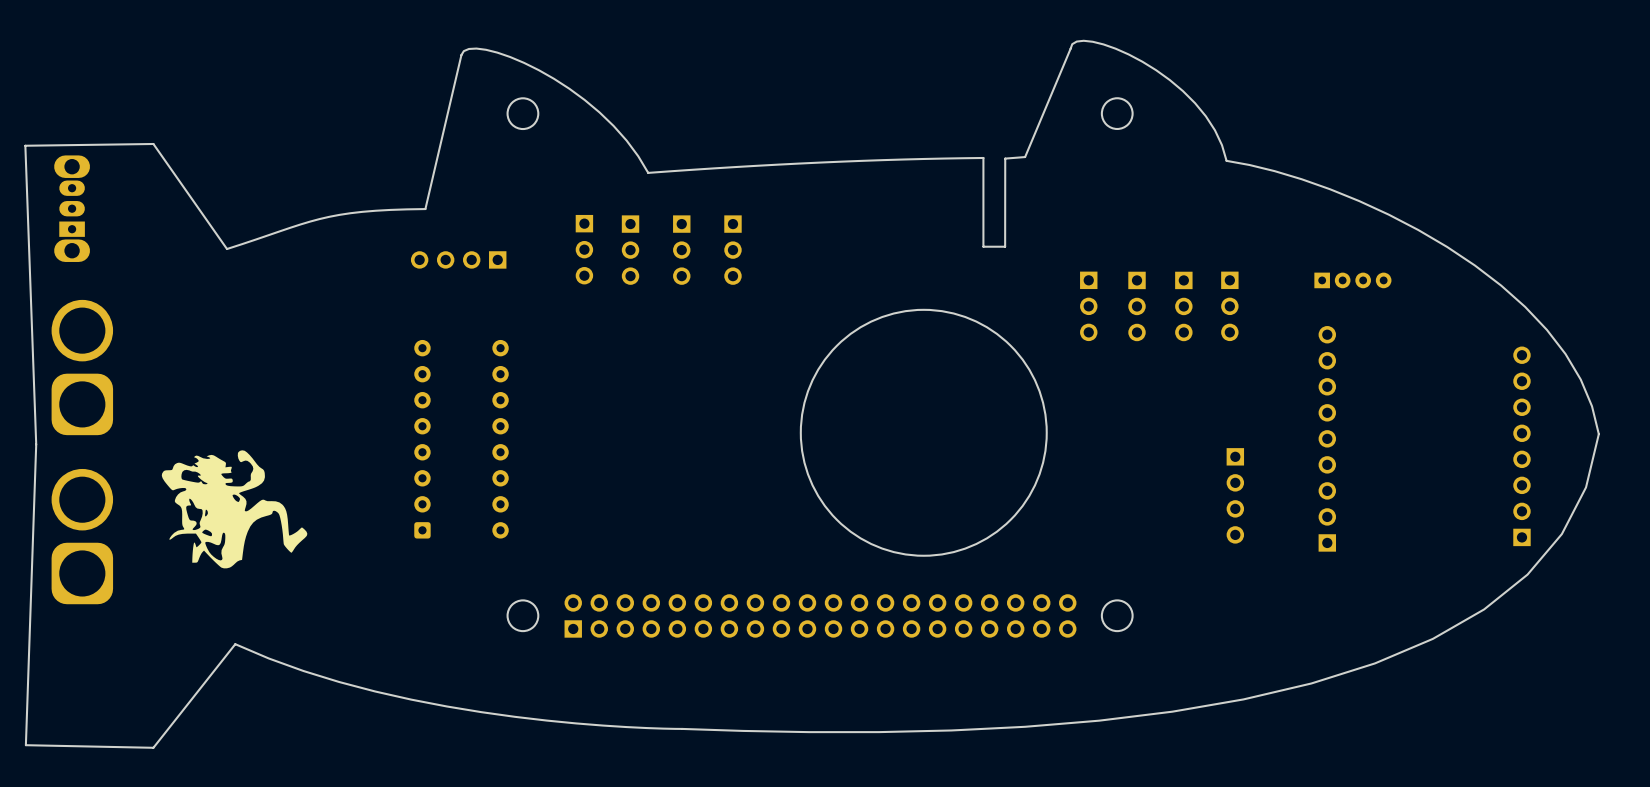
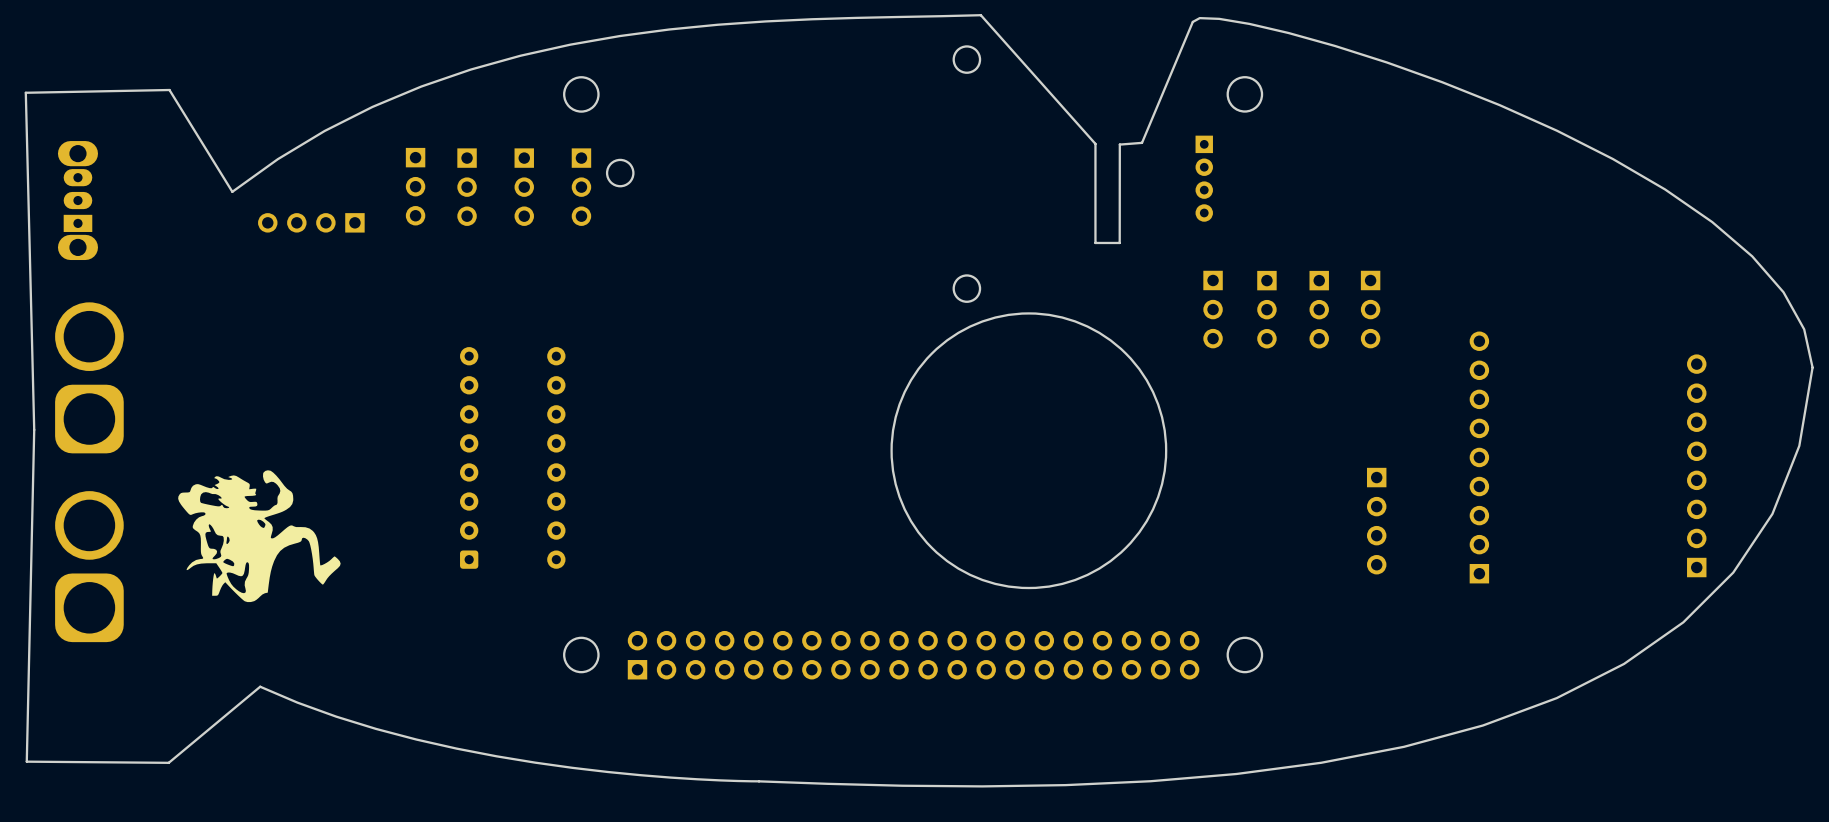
board edge: (1070, 48) (1072, 44) (1076, 41) (1092, 41) (1115, 48) (1142, 61) (1169, 80) (1195, 103) (1214, 130) (1226, 160) (1301, 179) (1388, 214) (1447, 246) (1474, 265) (1525, 306) (1546, 329) (1565, 354) (1580, 379) (1592, 406) (1598, 434) (1586, 487) (1561, 534) (1527, 574) (1484, 609) (1432, 638) (1374, 663) (1311, 683) (1243, 699) (1172, 711) (1025, 726) (879, 732) (682, 728) -> (1192, 21) (1199, 18) (1219, 18) (1288, 33) (1386, 62) (1442, 82) (1557, 130) (1612, 158) (1665, 189) (1712, 222) (1752, 256) (1783, 292) (1804, 329) (1812, 367) (1799, 445) (1772, 513) (1733, 572) (1683, 622) (1624, 663) (1556, 698) (1482, 725) (1404, 746) (1321, 762) (1236, 773) (1150, 781) (982, 786) (759, 781)
round board edge: none -> [952, 45, 982, 74]
board edge: (983, 157) (821, 162) (648, 172) (638, 156) (613, 125) (569, 88) (524, 62) (497, 52) (476, 48) (463, 51) (461, 55) (425, 209) (375, 210) (329, 216) (227, 249) (153, 143) (25, 145) (36, 444) (25, 745) (153, 747) (235, 644) -> (1095, 143) (980, 15) (811, 19) (717, 24) (619, 36) (520, 55) (470, 69) (421, 86) (372, 106) (324, 131) (277, 159) (232, 191) (169, 90) (25, 92) (34, 429) (26, 761) (168, 762) (260, 686)
round board edge: none -> [605, 158, 635, 188]
part: none -> (1204, 178)
part: none -> (415, 186)
part: none -> (467, 187)
part: none -> (524, 187)
part: none -> (581, 187)
part: (584, 249) -> none
part: (630, 250) -> none
part: (681, 250) -> none
part: (732, 250) -> none
part position: (458, 259) -> (311, 222)
round board edge: none -> [952, 274, 982, 303]
part: (1352, 280) -> none

